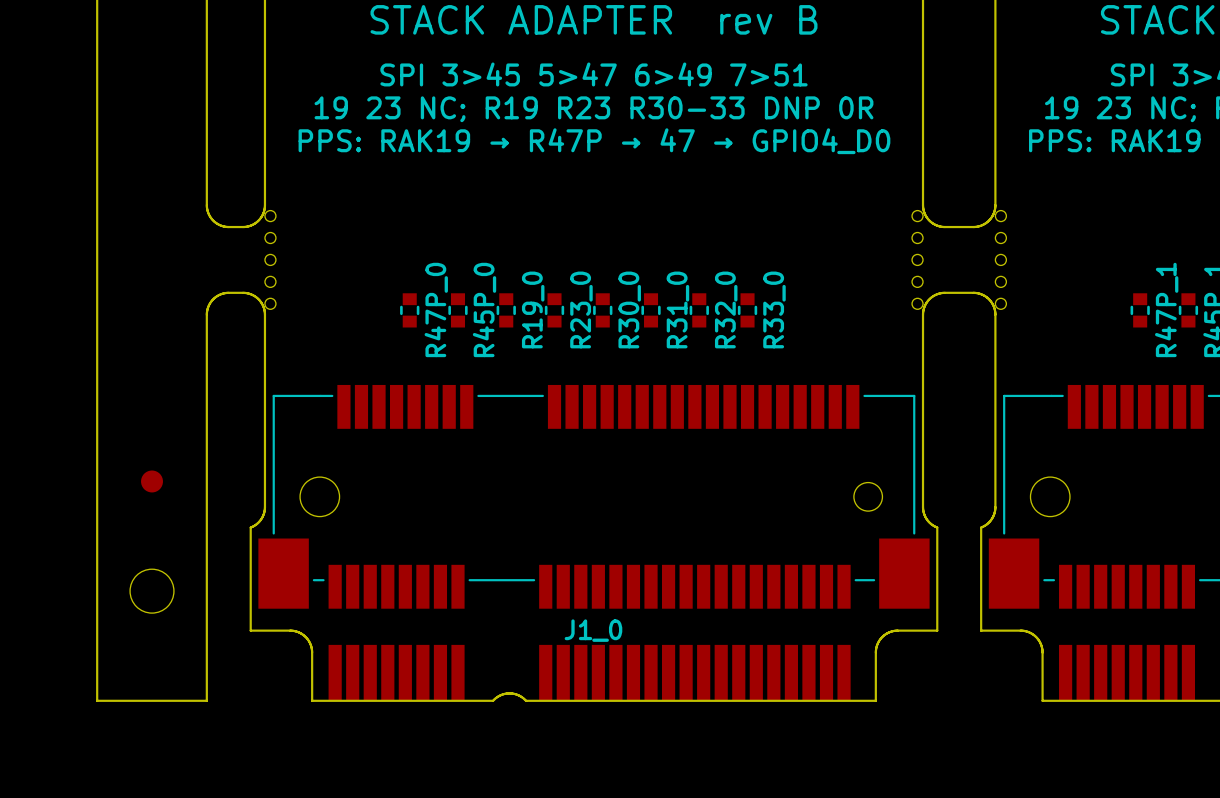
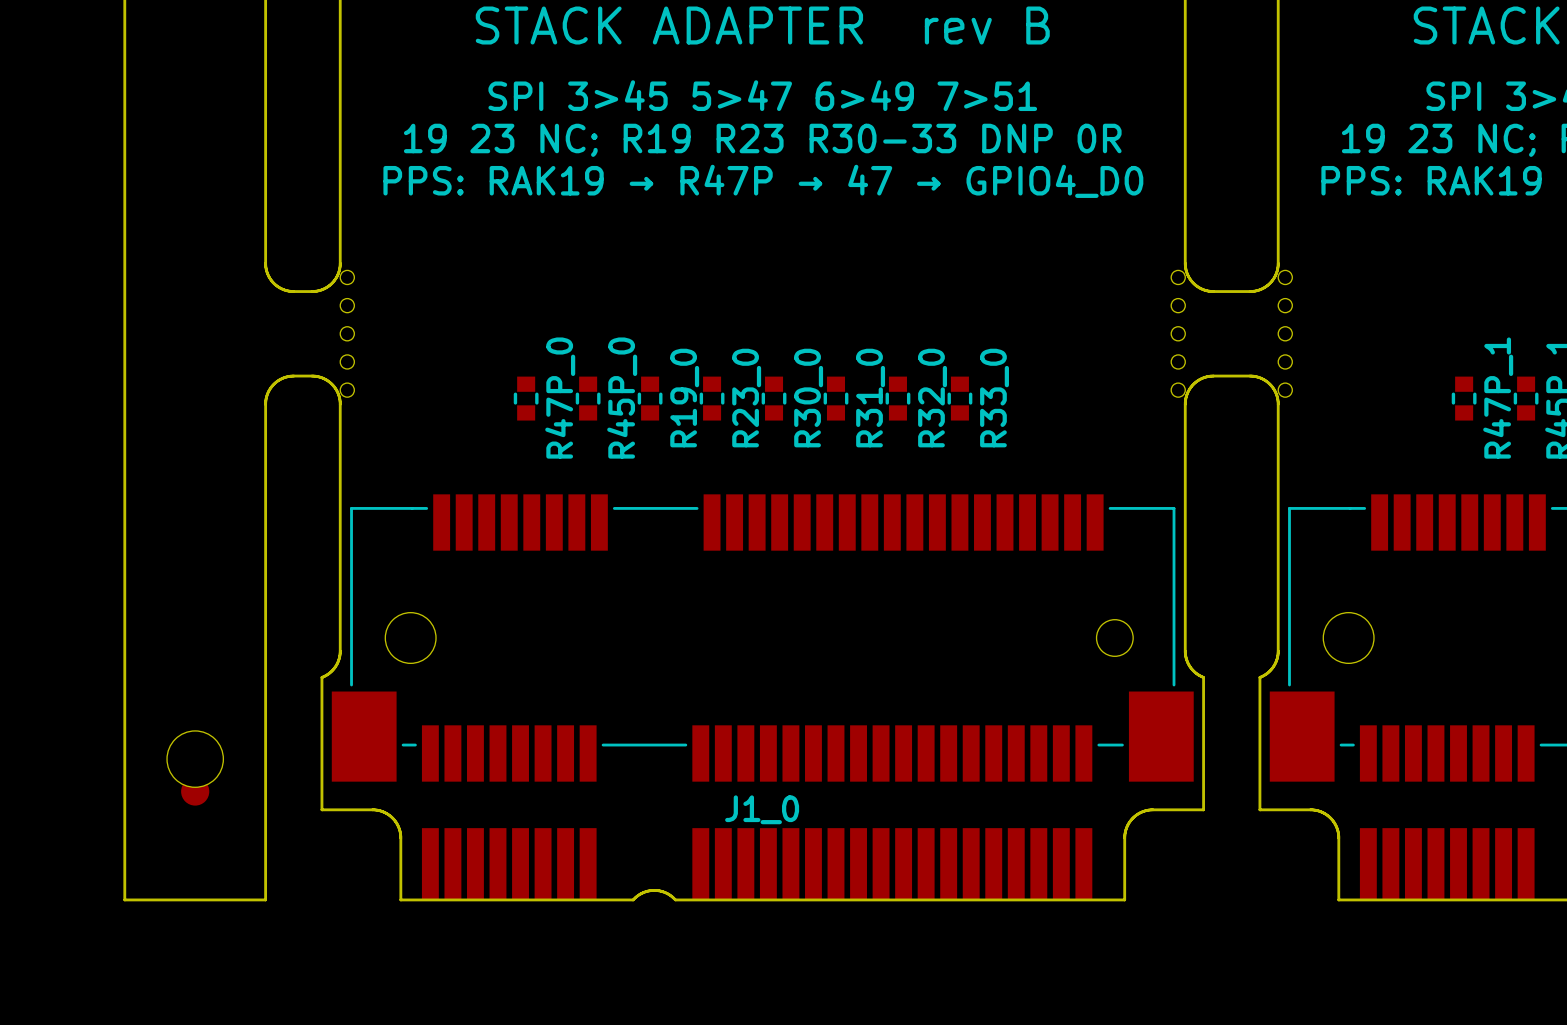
part position: (152, 481) -> (195, 791)

